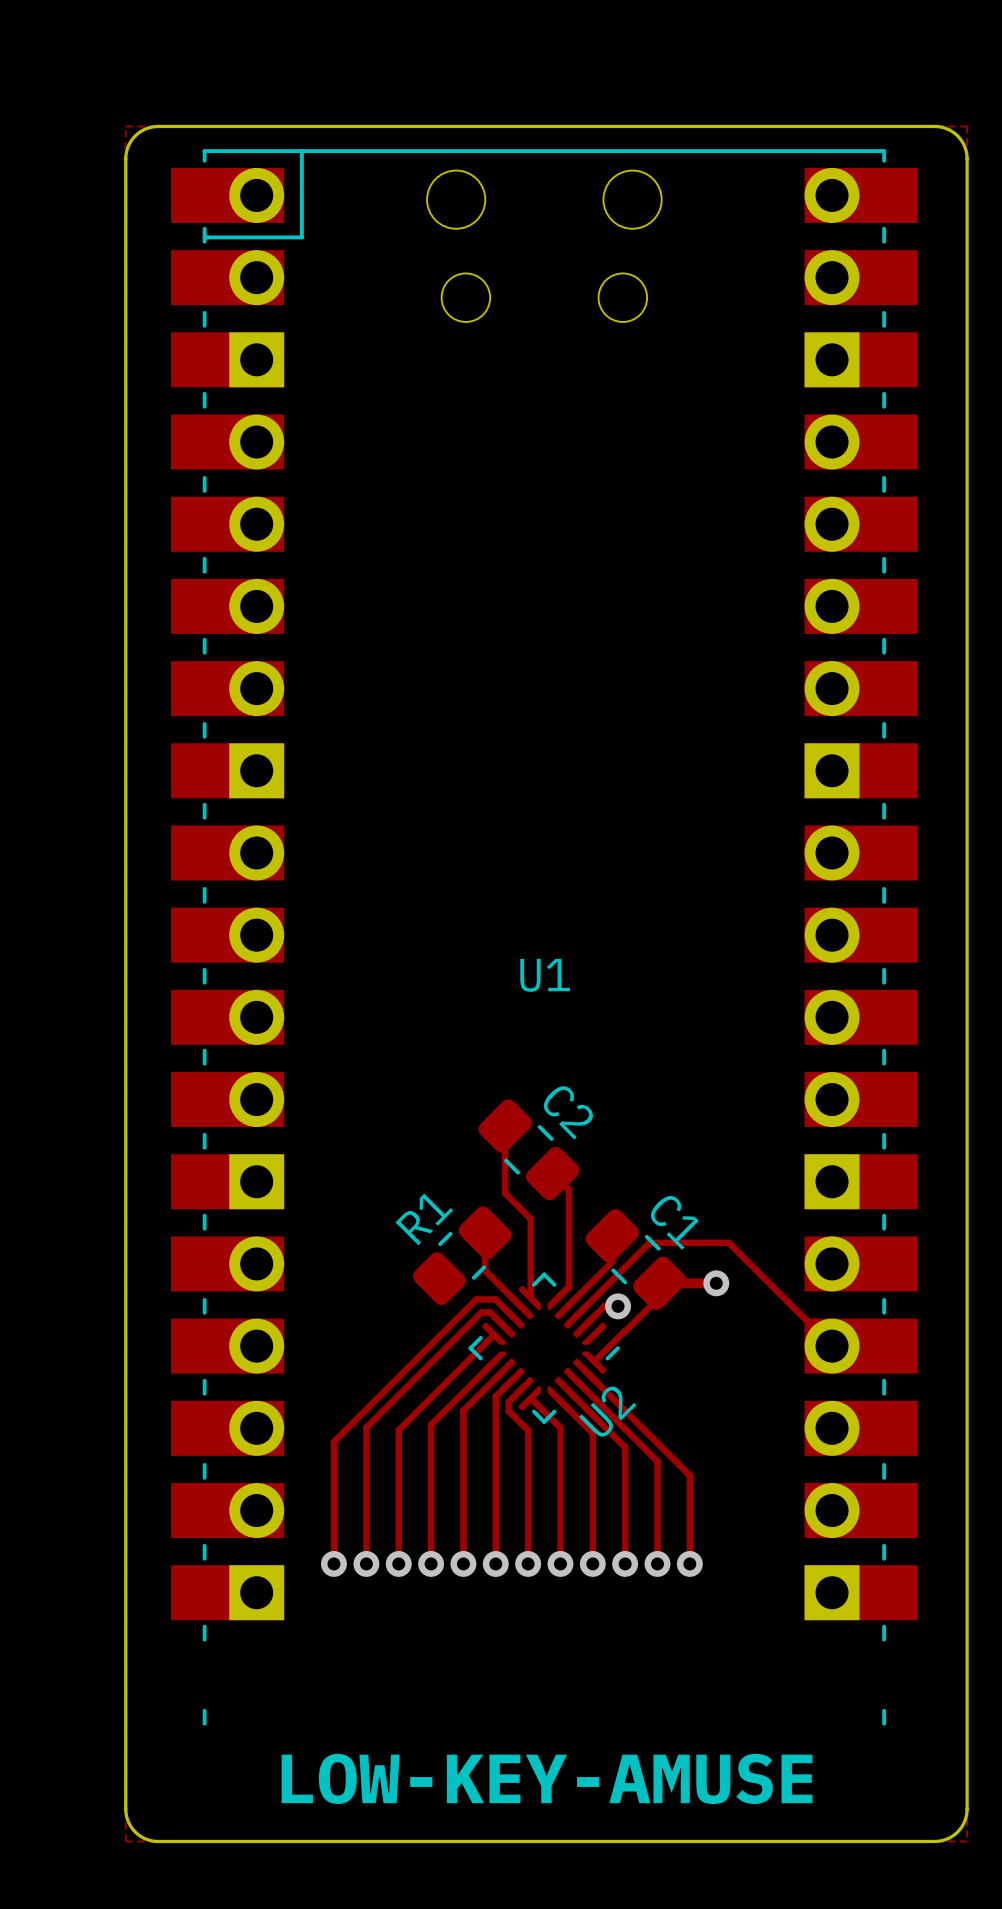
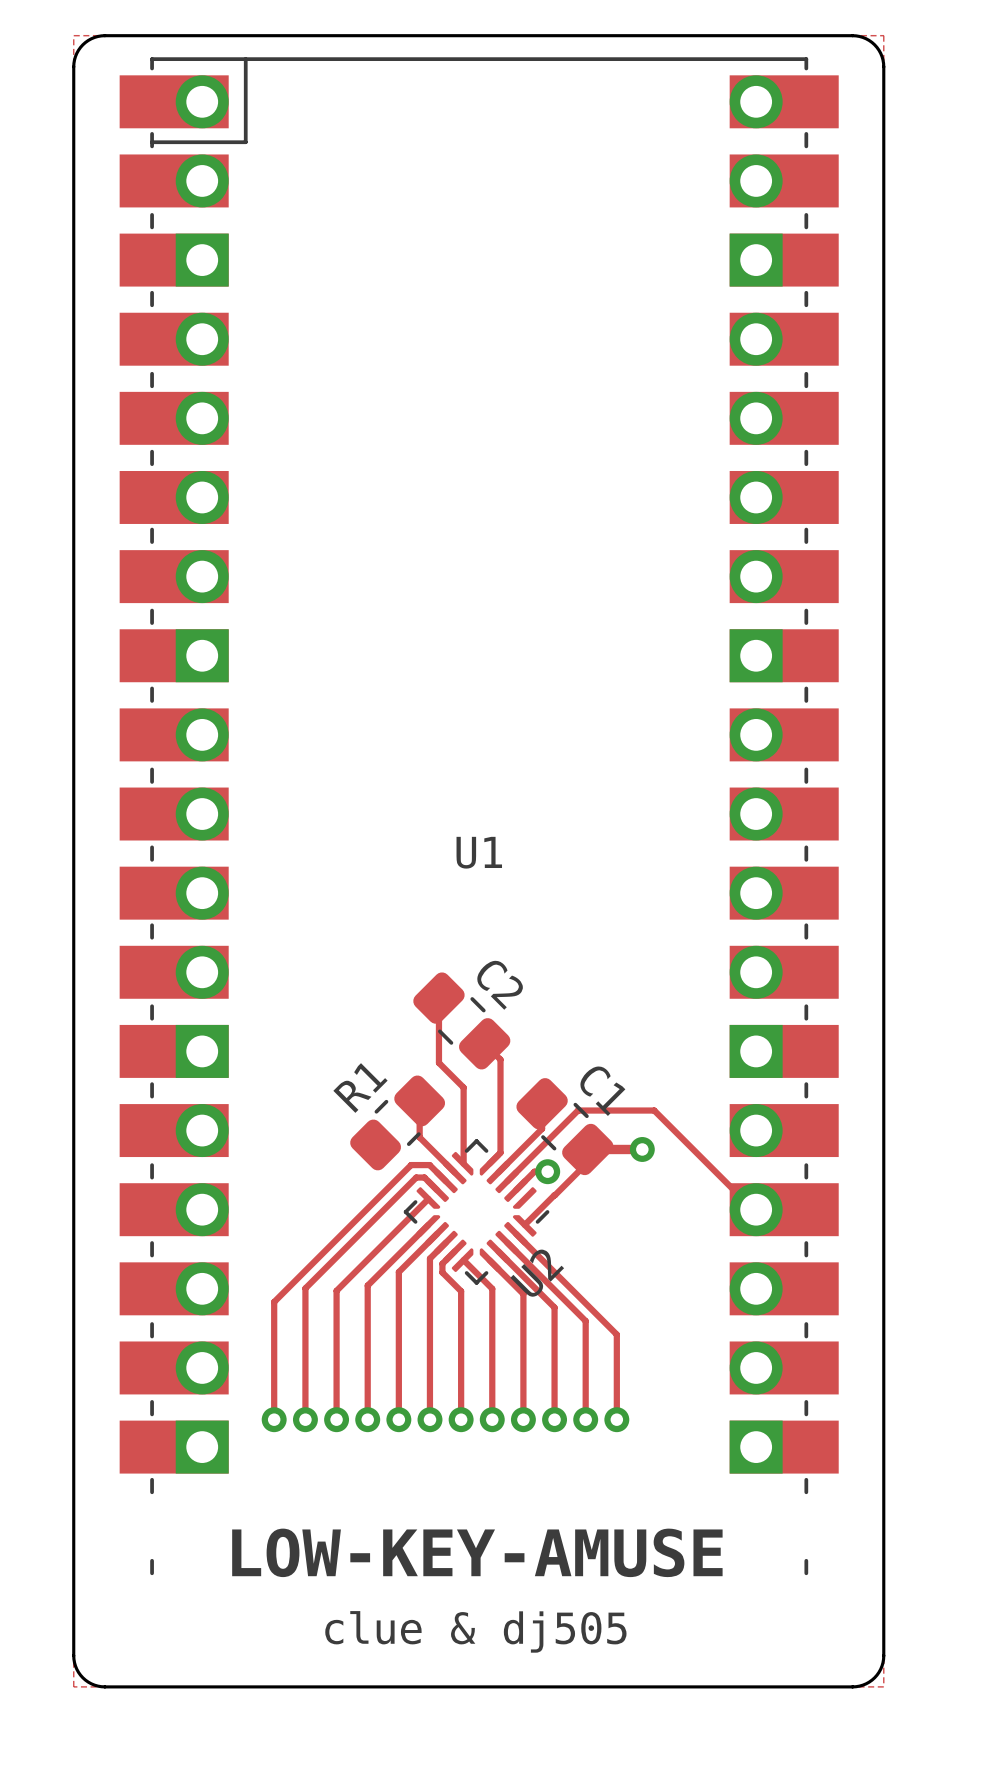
U1 footprint: [170, 149, 918, 1726] -> [119, 57, 839, 1576]
text position: LOW-KEY-AMUSE (547, 1778) -> LOW-KEY-AMUSE (477, 1552)
text: none -> clue & dj505 (475, 1631)

